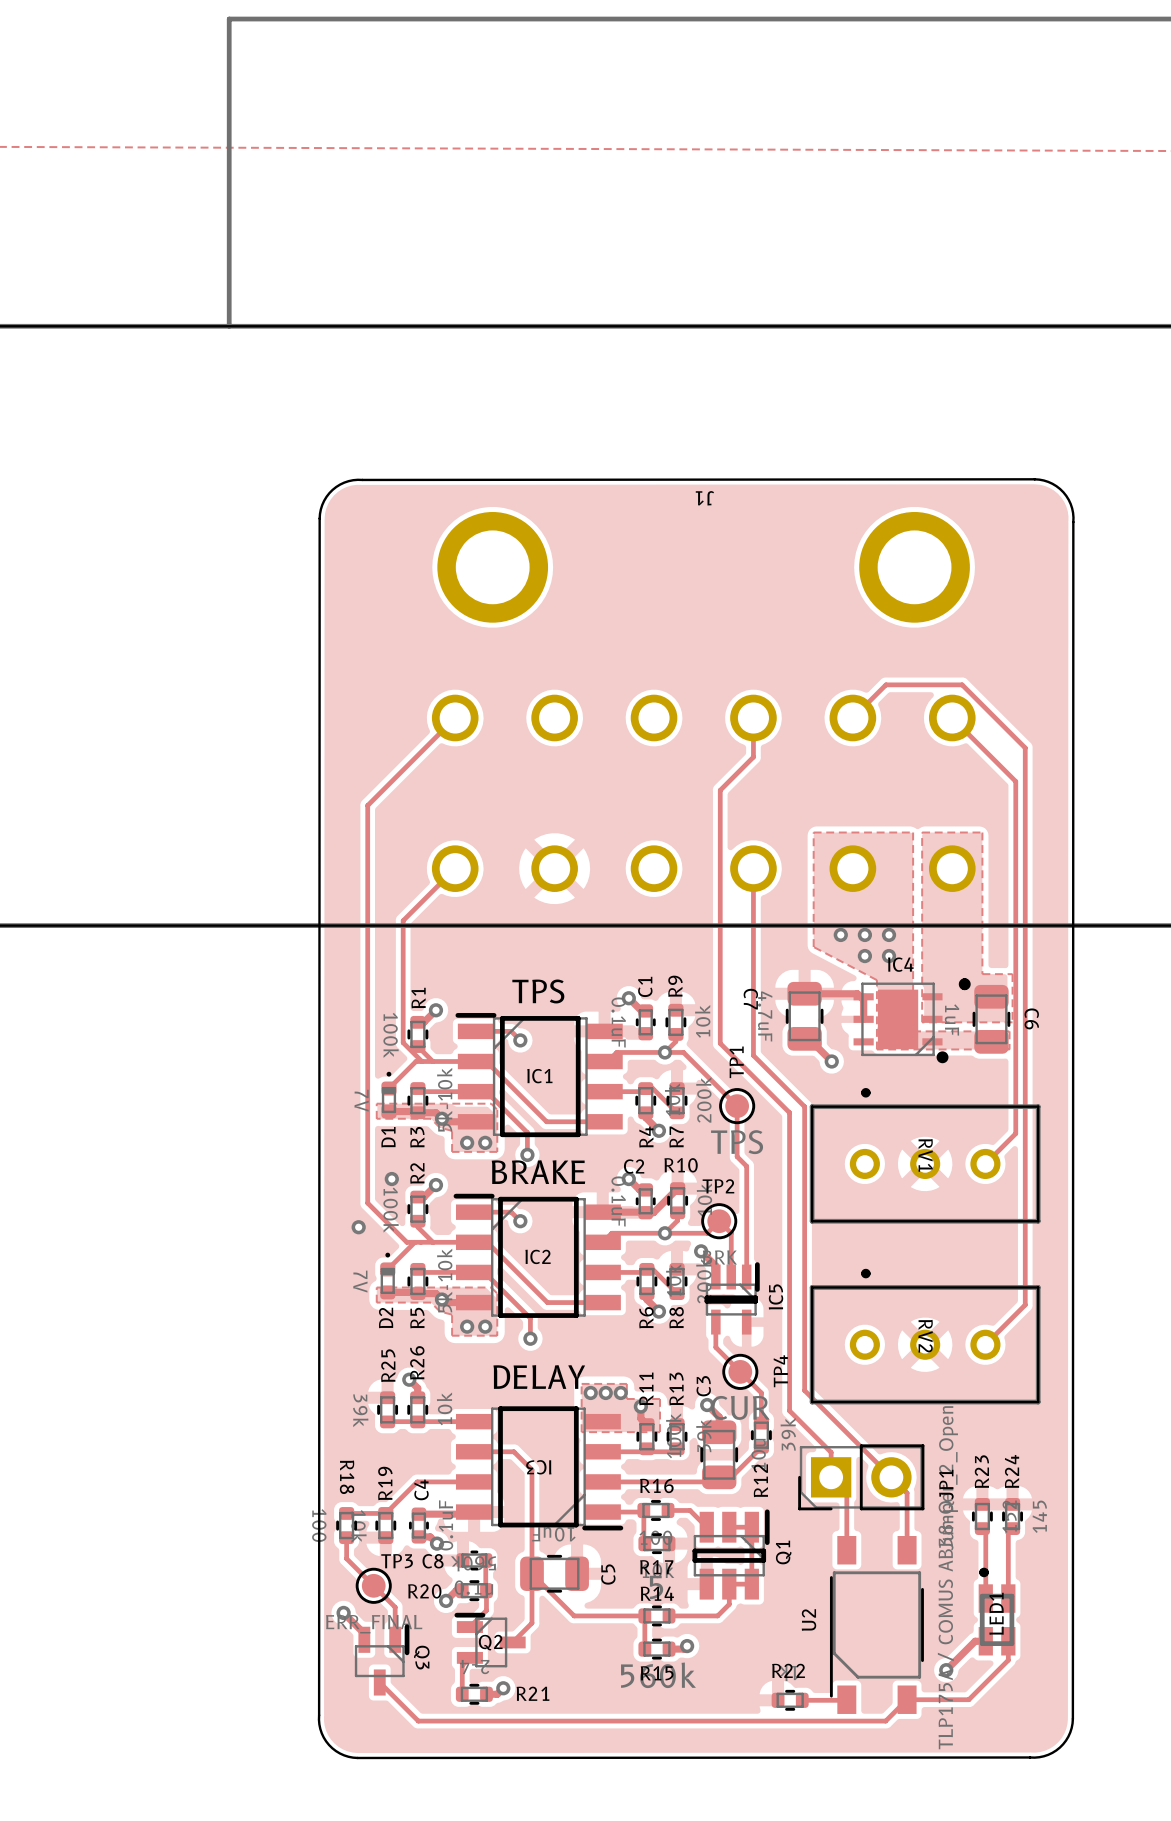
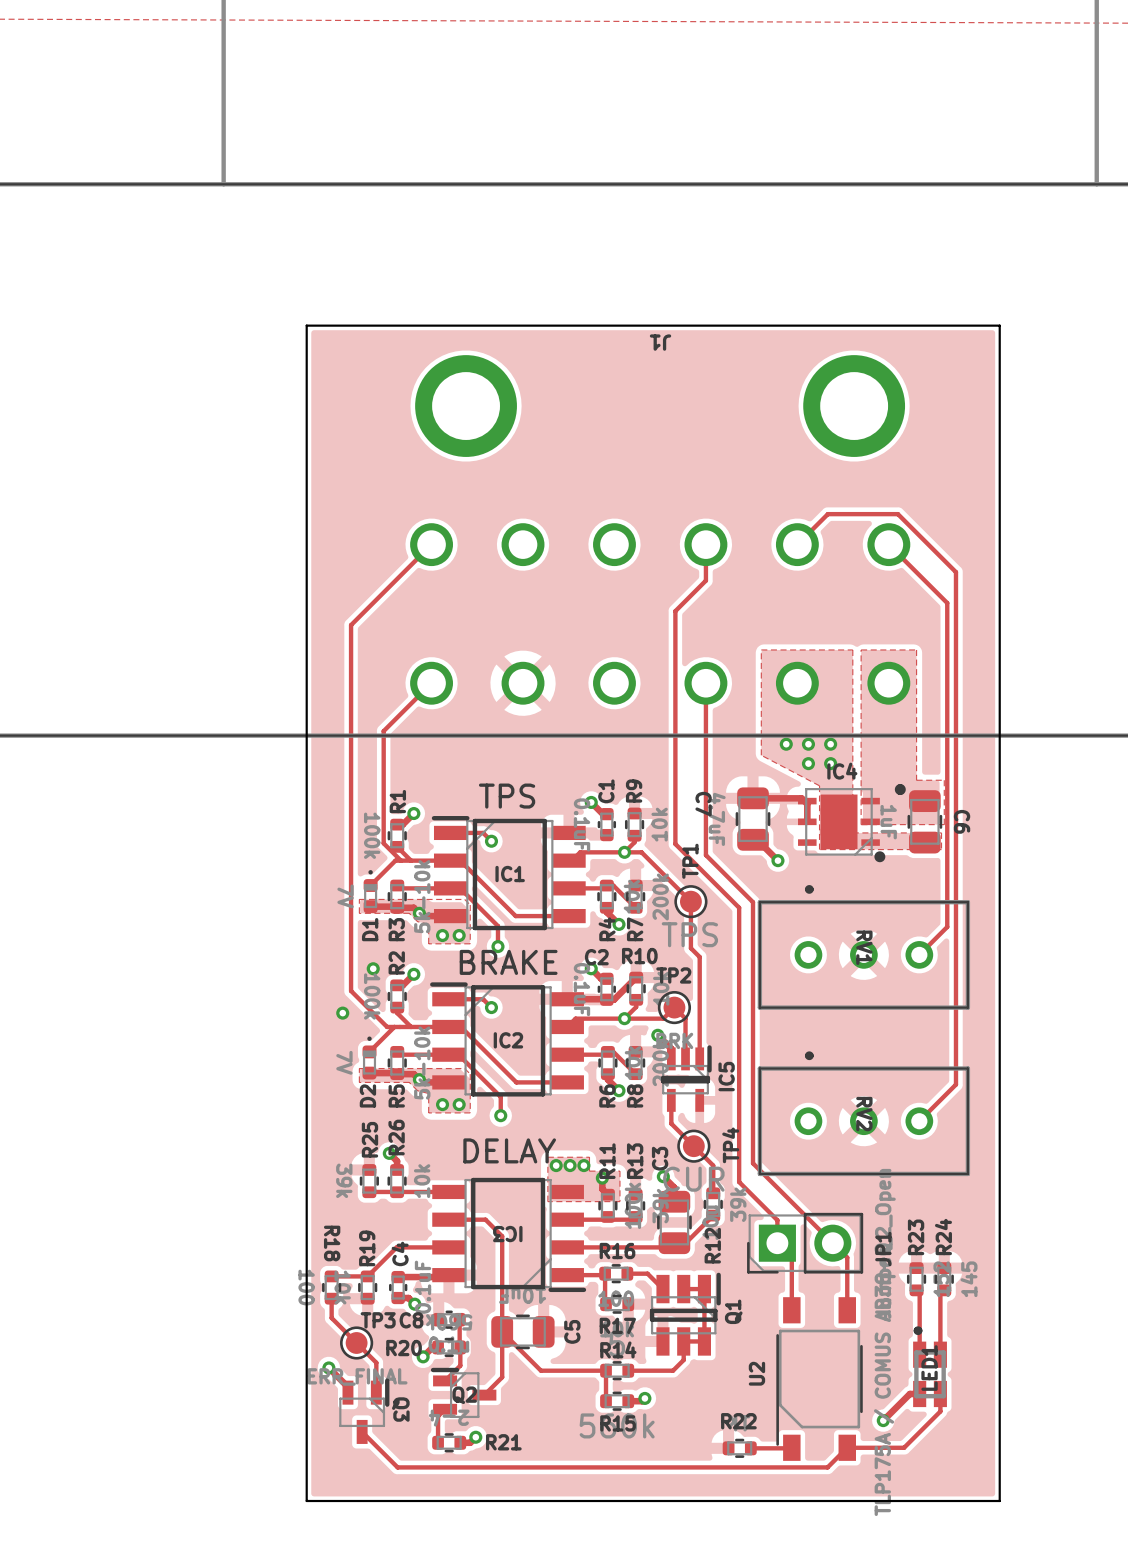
board edge: (1034, 479) (357, 479) (348, 481) (336, 487) (324, 500) (319, 518) (318, 1719) (323, 1737) (332, 1748) (339, 1753) (357, 1757) (1034, 1757) (1043, 1756) (1056, 1750) (1068, 1736) (1072, 1718) (1073, 517) (1070, 503) (1063, 492) (1052, 483) (1034, 479) -> (306, 325) (306, 1501) (999, 1501) (999, 325) (306, 325)

